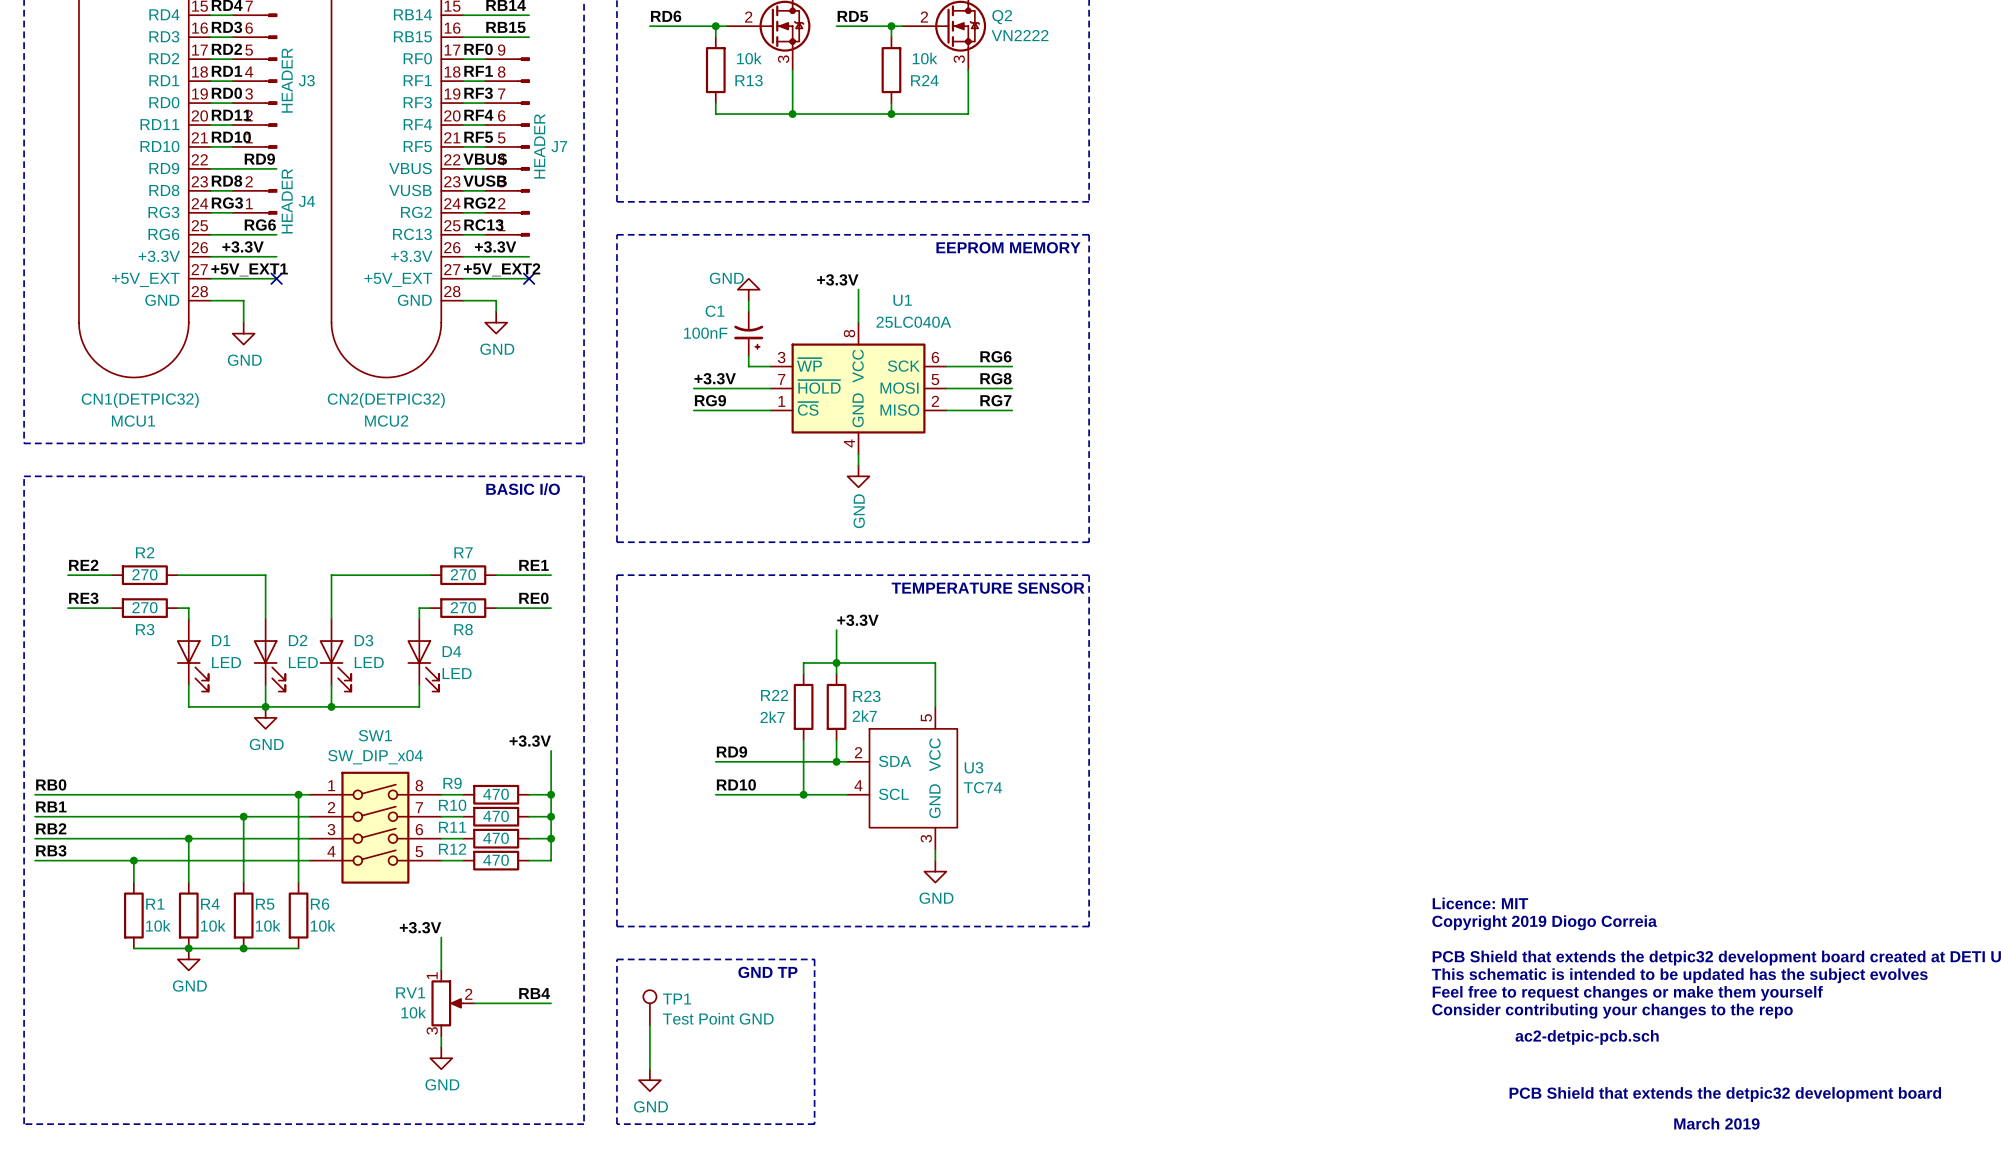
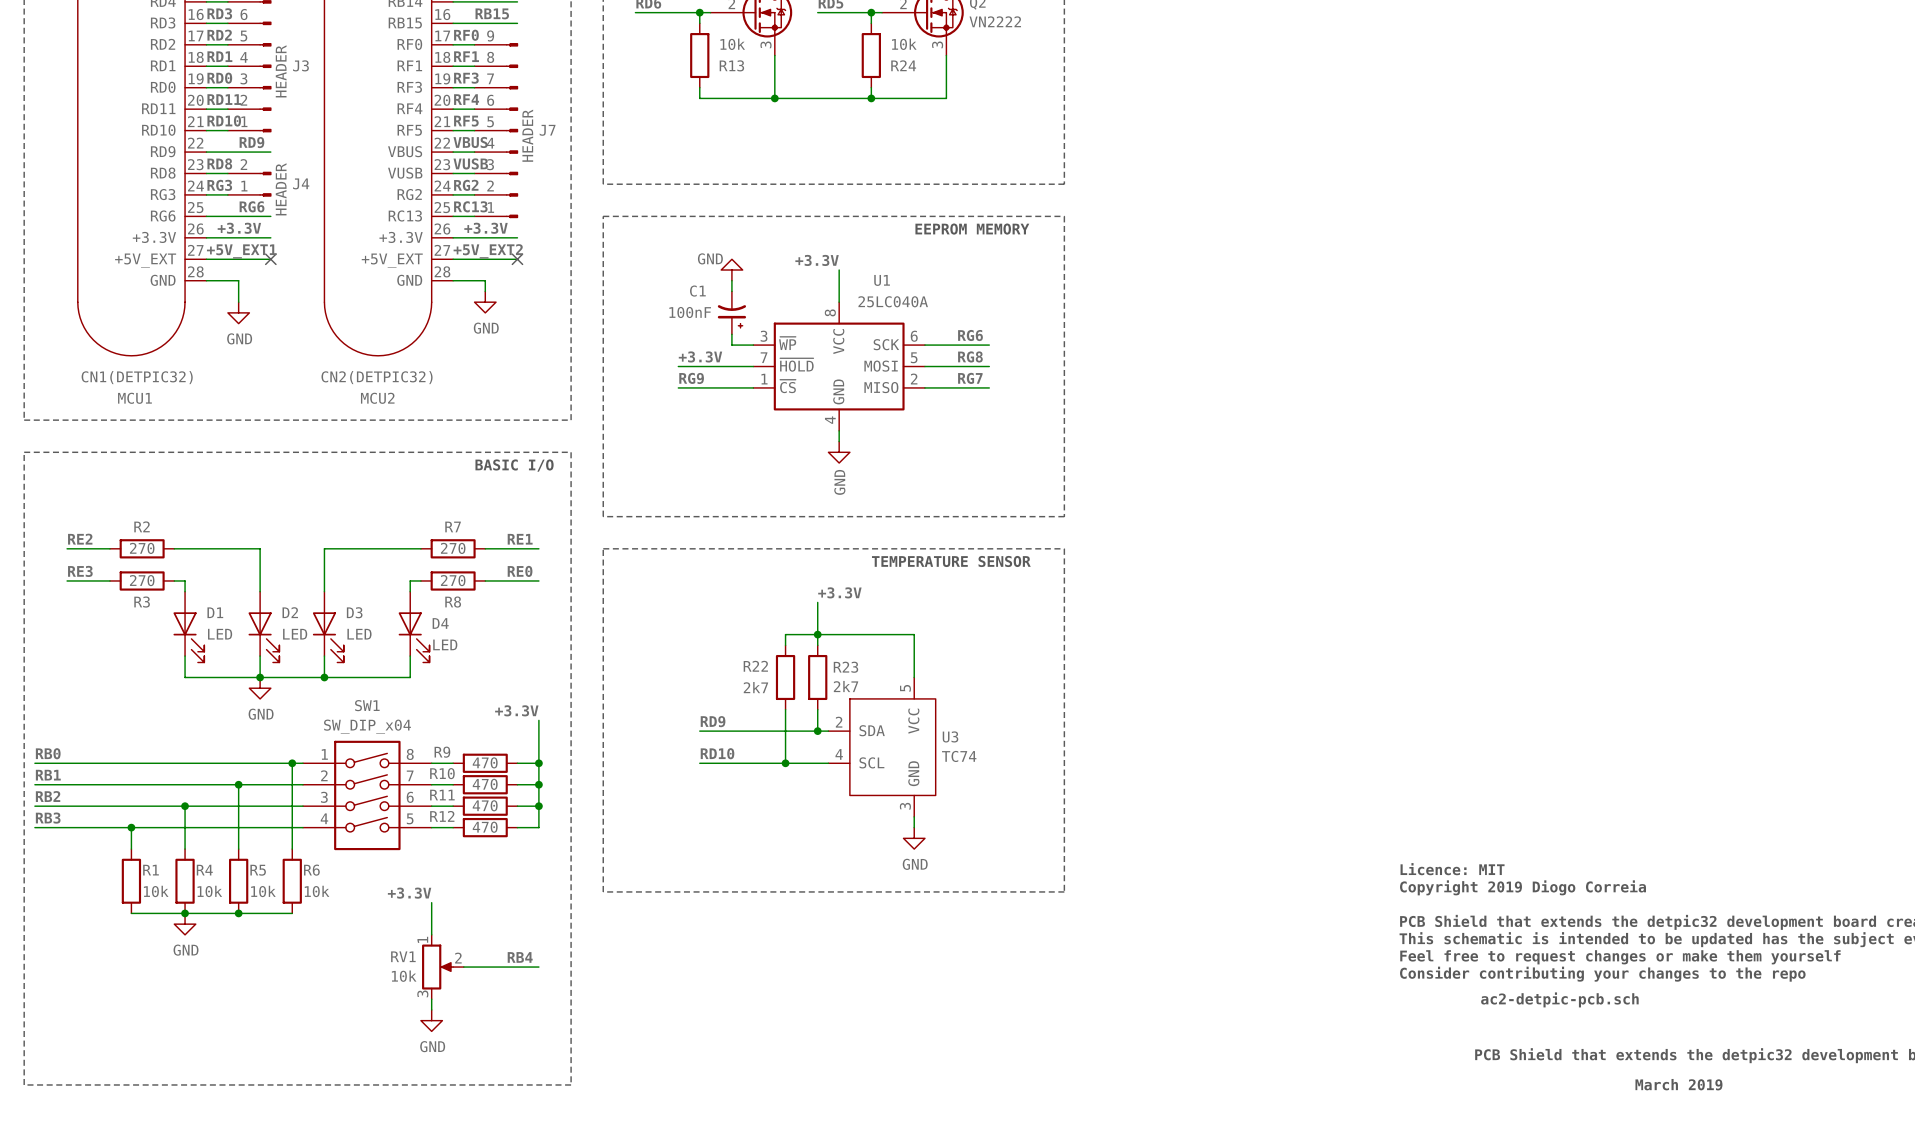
line: (616, 959) (814, 959) (814, 1124) (616, 1124) (616, 959) -> none
text: GND TP (767, 972) -> none
TP1: Test Point GND (649, 1007) -> none
wire: (649, 1025) (649, 1069) -> none
power symbol: GND (649, 1080) -> none

